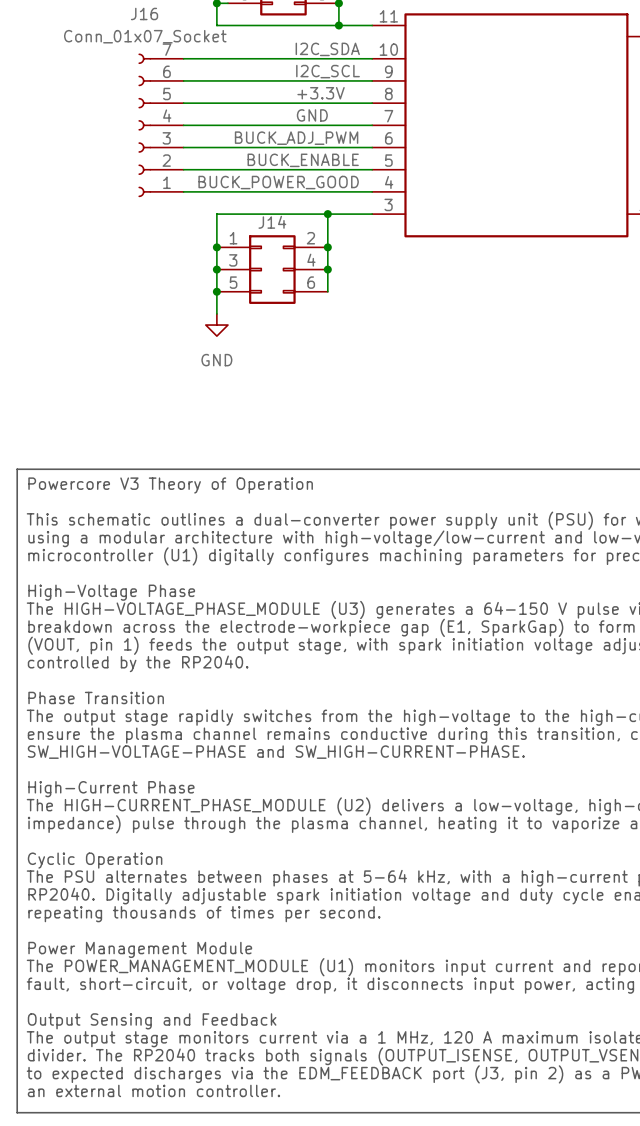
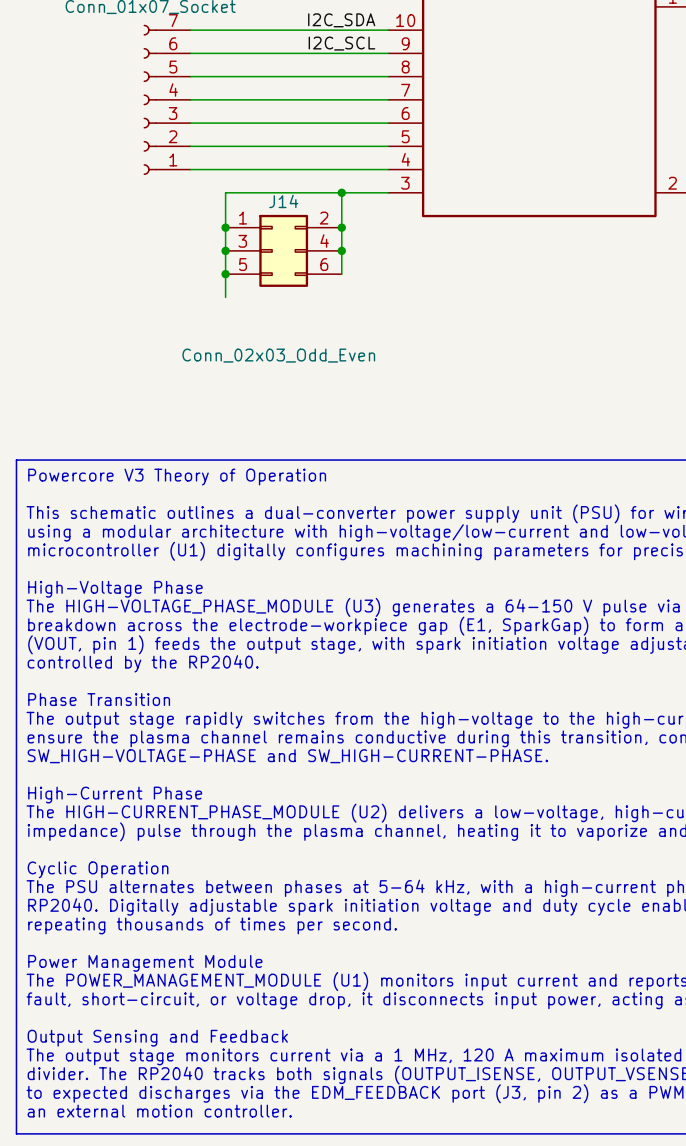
label: +3.3V (321, 93) -> none
label: GND (312, 115) -> none
label: BUCK_ADJ_PWM (296, 138) -> none
label: BUCK_ENABLE (303, 160) -> none
label: BUCK_POWER_GOOD (278, 182) -> none
power symbol: GND (216, 325) -> none
J14 value: none -> Conn_02x03_Odd_Even (278, 355)

